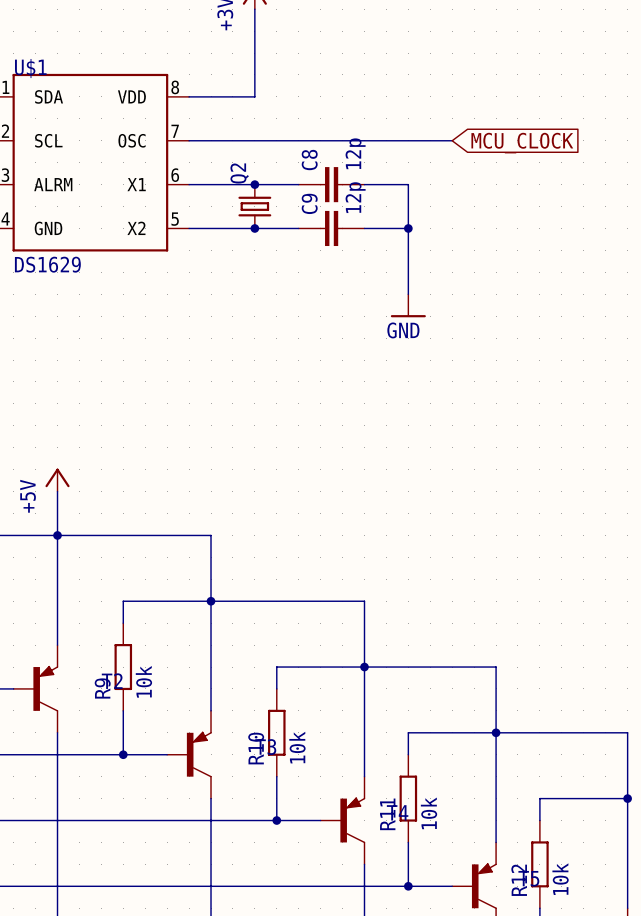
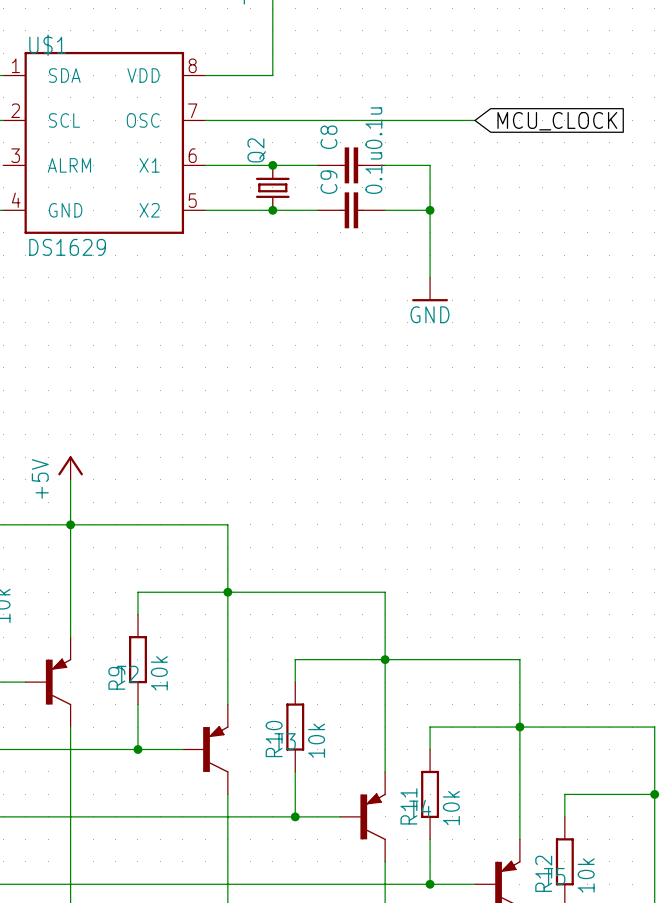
C8 value: 12p (355, 153) -> 0.1u (373, 128)
C9 value: 12p (355, 197) -> 0.1u (373, 173)

